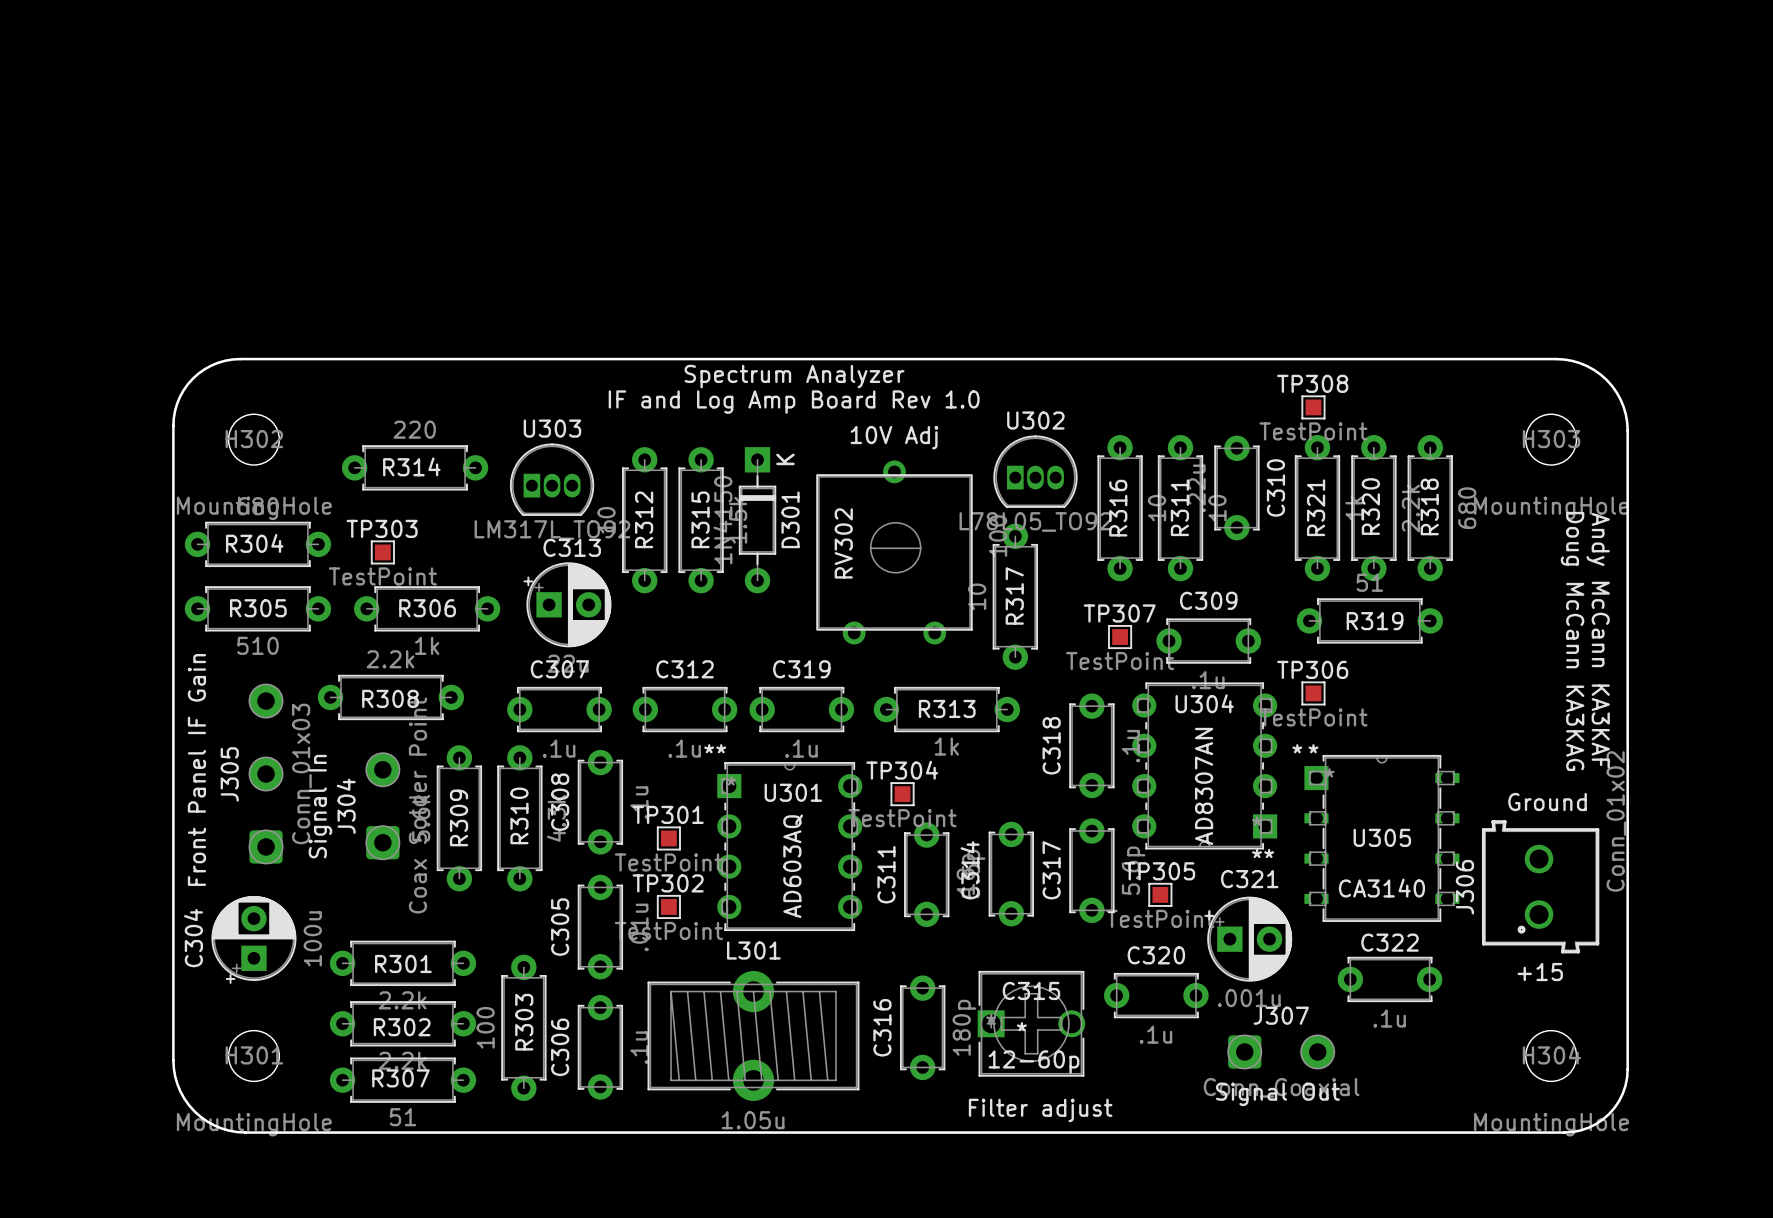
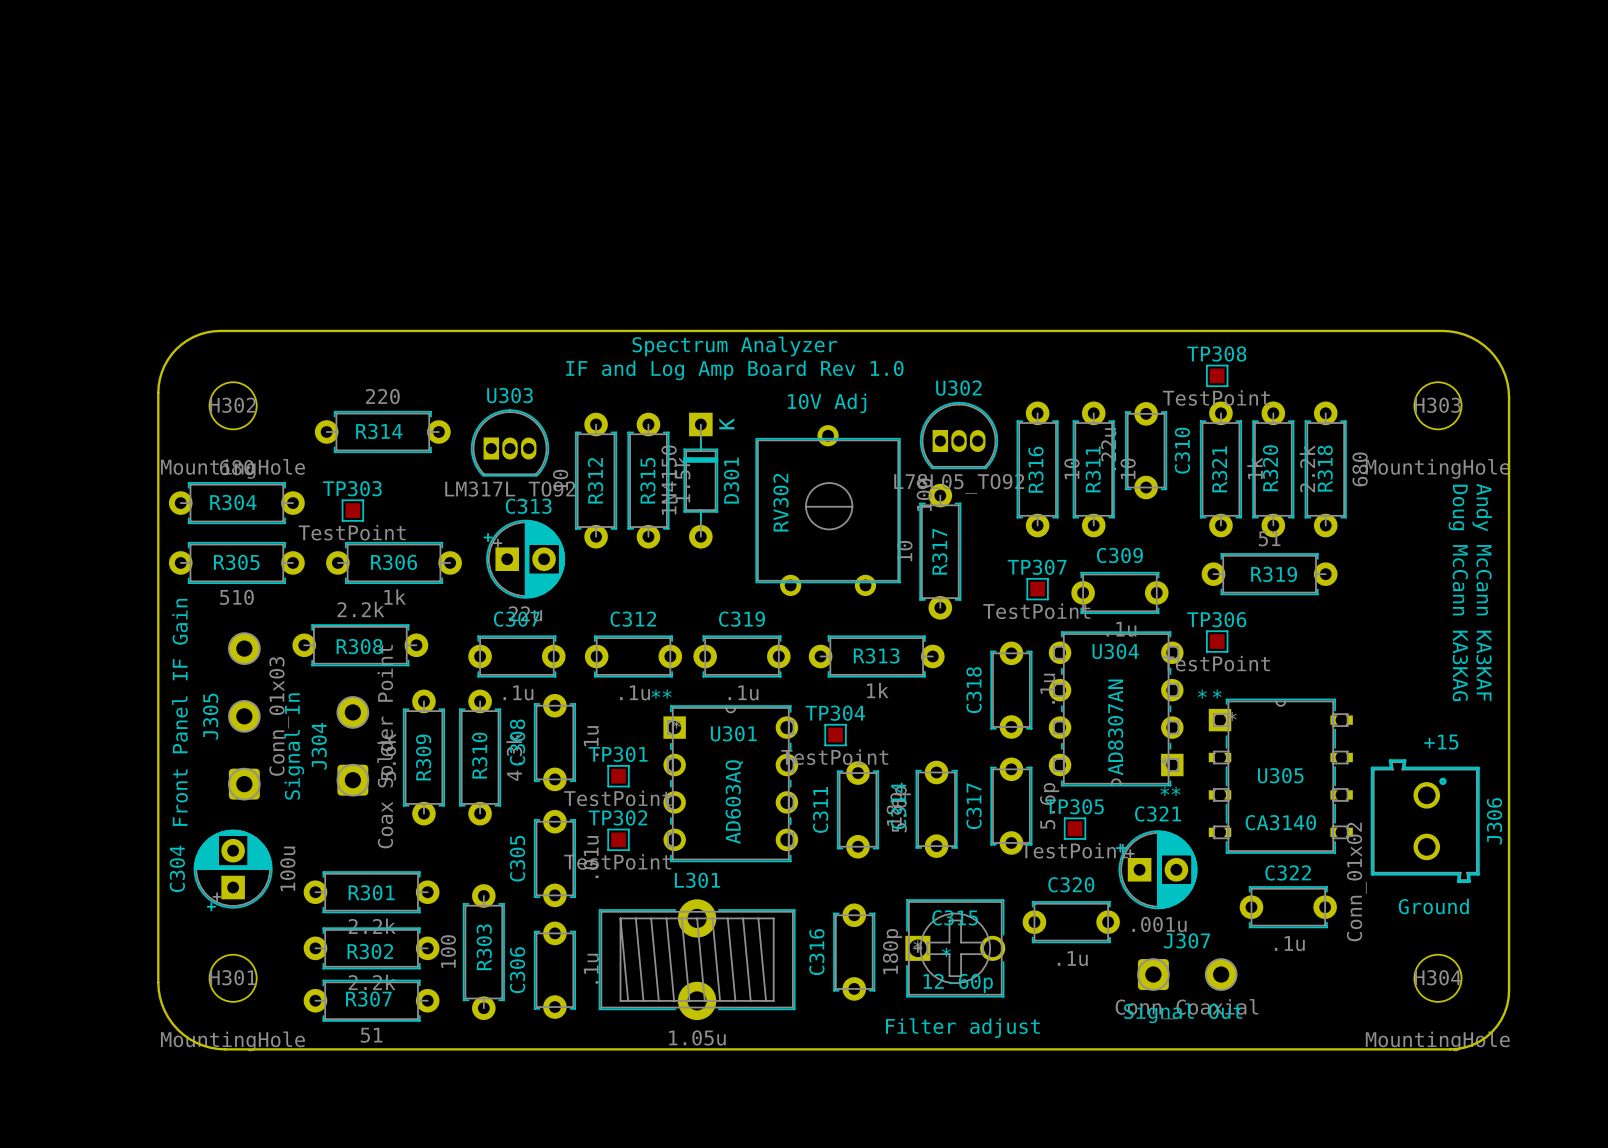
text: Ground (1547, 802) -> +15 (1441, 742)
J306 rotation: 0° (1540, 886) -> 180° (1425, 821)
text: +15 (1540, 972) -> Ground (1433, 906)

